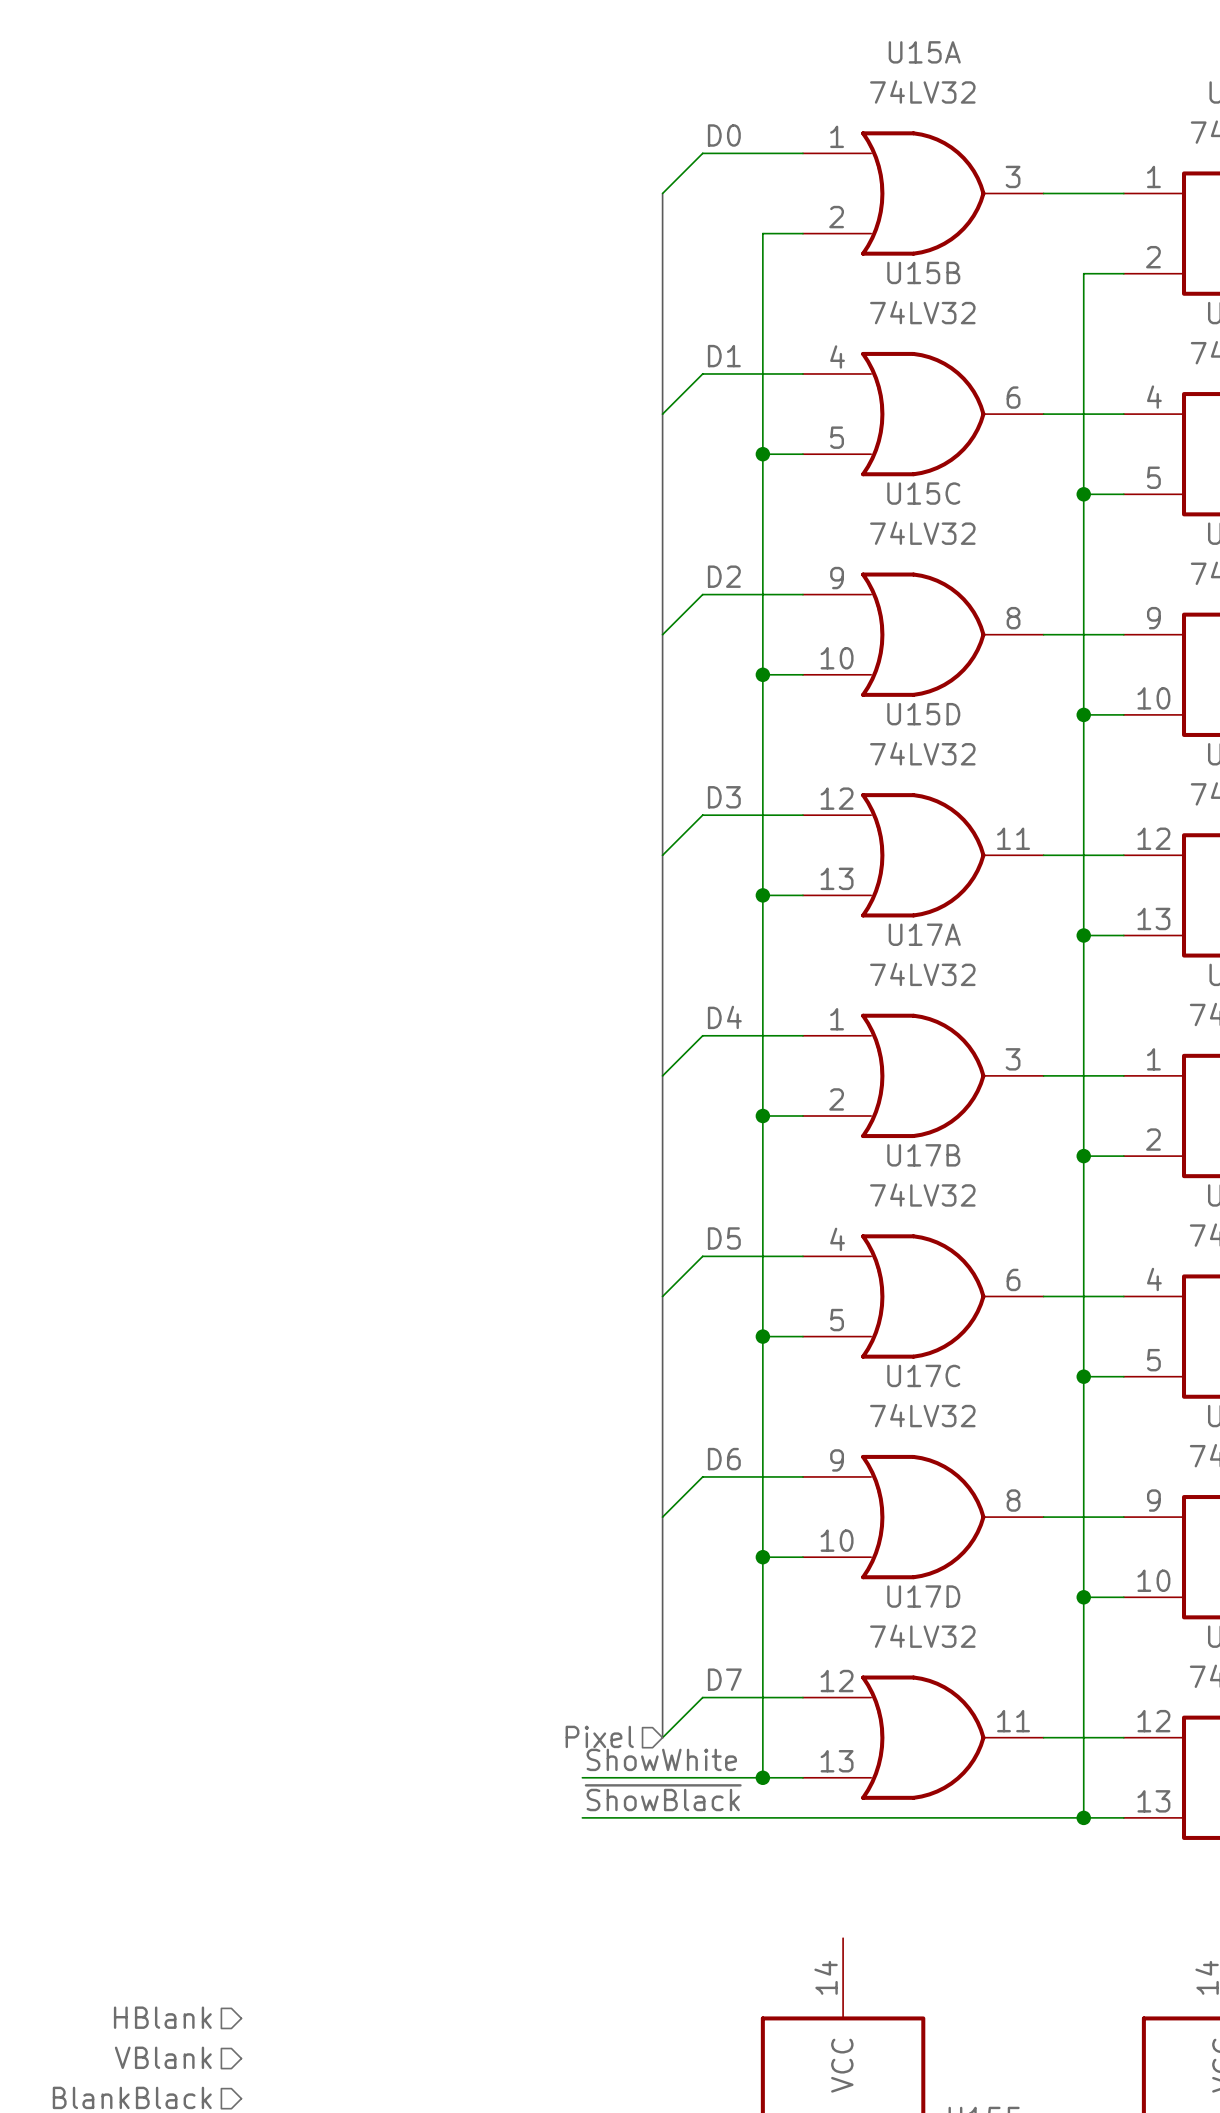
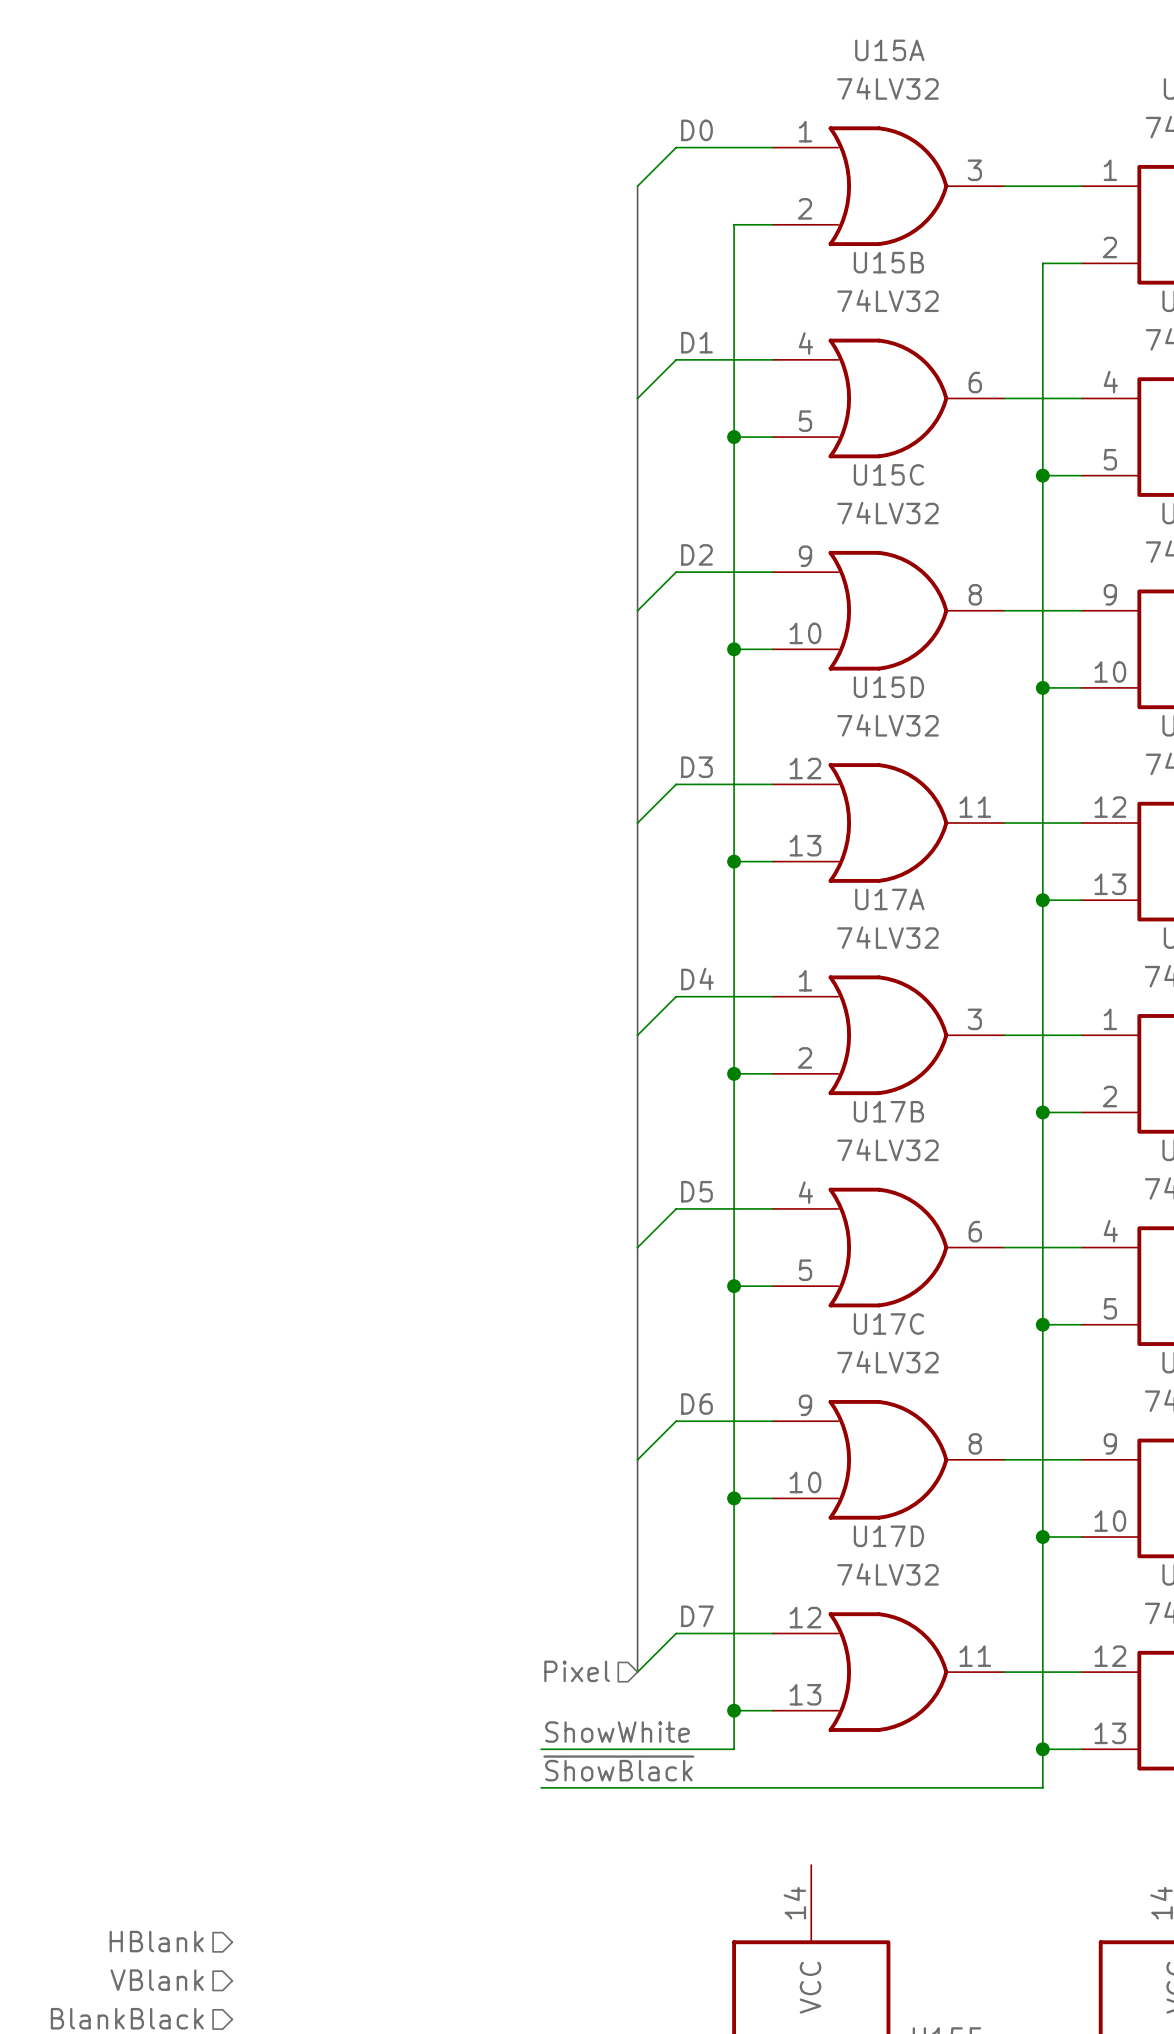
label position: ShowWhite (661, 1759) -> ShowWhite (617, 1732)
wire: (582, 1777) (762, 1777) -> (734, 1749) (734, 1710)
label position: ~{ShowBlack} (663, 1797) -> ~{ShowBlack} (618, 1768)
wire: none -> (541, 1749) (560, 1749)
wire: (762, 1817) (1083, 1817) -> (541, 1787) (1042, 1787) (1042, 1749)

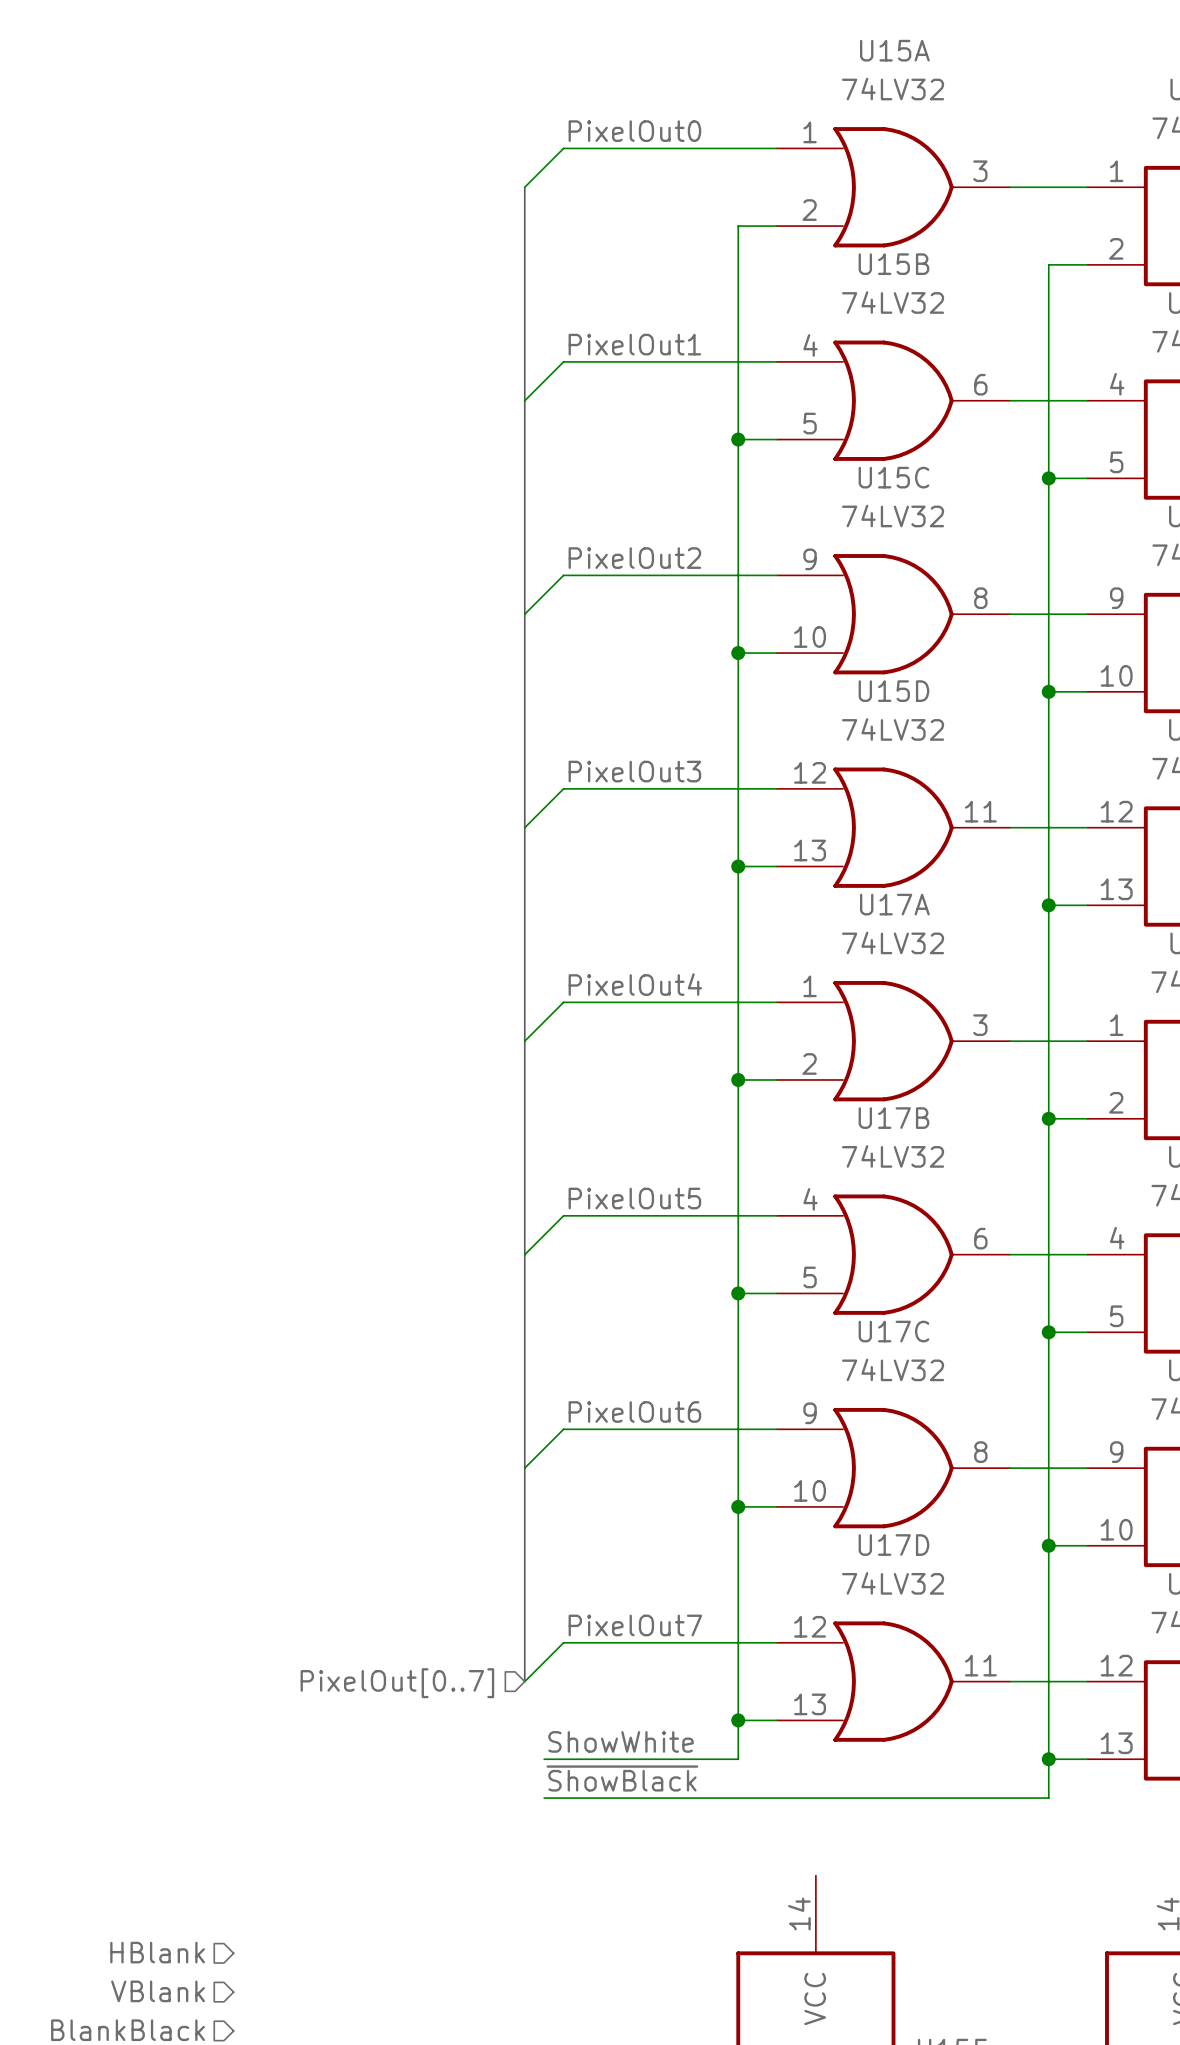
label: none -> PixelOut0 (634, 131)
label: D0 (697, 130) -> none
wire: (676, 147) (637, 186) -> (680, 148) (563, 148) (524, 187)
bus: (637, 186) (637, 1672) -> (524, 187) (524, 1681)
label: none -> PixelOut1 (634, 344)
label: D1 (697, 342) -> none
wire: (676, 359) (637, 398) -> (680, 361) (563, 361) (524, 400)
label: none -> PixelOut2 (634, 558)
label: D2 (697, 554) -> none
wire: (676, 572) (637, 610) -> (680, 575) (563, 575) (524, 614)
label: none -> PixelOut3 (634, 771)
label: D3 (697, 767) -> none
wire: (676, 784) (637, 823) -> (680, 788) (563, 788) (524, 827)
label: none -> PixelOut4 (635, 984)
label: D4 (697, 979) -> none
wire: (676, 996) (637, 1035) -> (680, 1002) (563, 1002) (524, 1041)
label: none -> PixelOut5 (634, 1198)
label: D5 (697, 1191) -> none
wire: (676, 1208) (637, 1247) -> (680, 1215) (563, 1215) (524, 1254)
label: none -> PixelOut6 (634, 1411)
label: D6 (697, 1404) -> none
wire: (676, 1421) (637, 1459) -> (680, 1429) (563, 1429) (524, 1468)
label: none -> PixelOut7 (635, 1625)
label: D7 (697, 1616) -> none
wire: (676, 1633) (637, 1672) -> (680, 1642) (563, 1642) (524, 1681)
hierarchical label: Pixel (577, 1671) -> none
hierarchical label: none -> PixelOut[0..7] (397, 1683)

